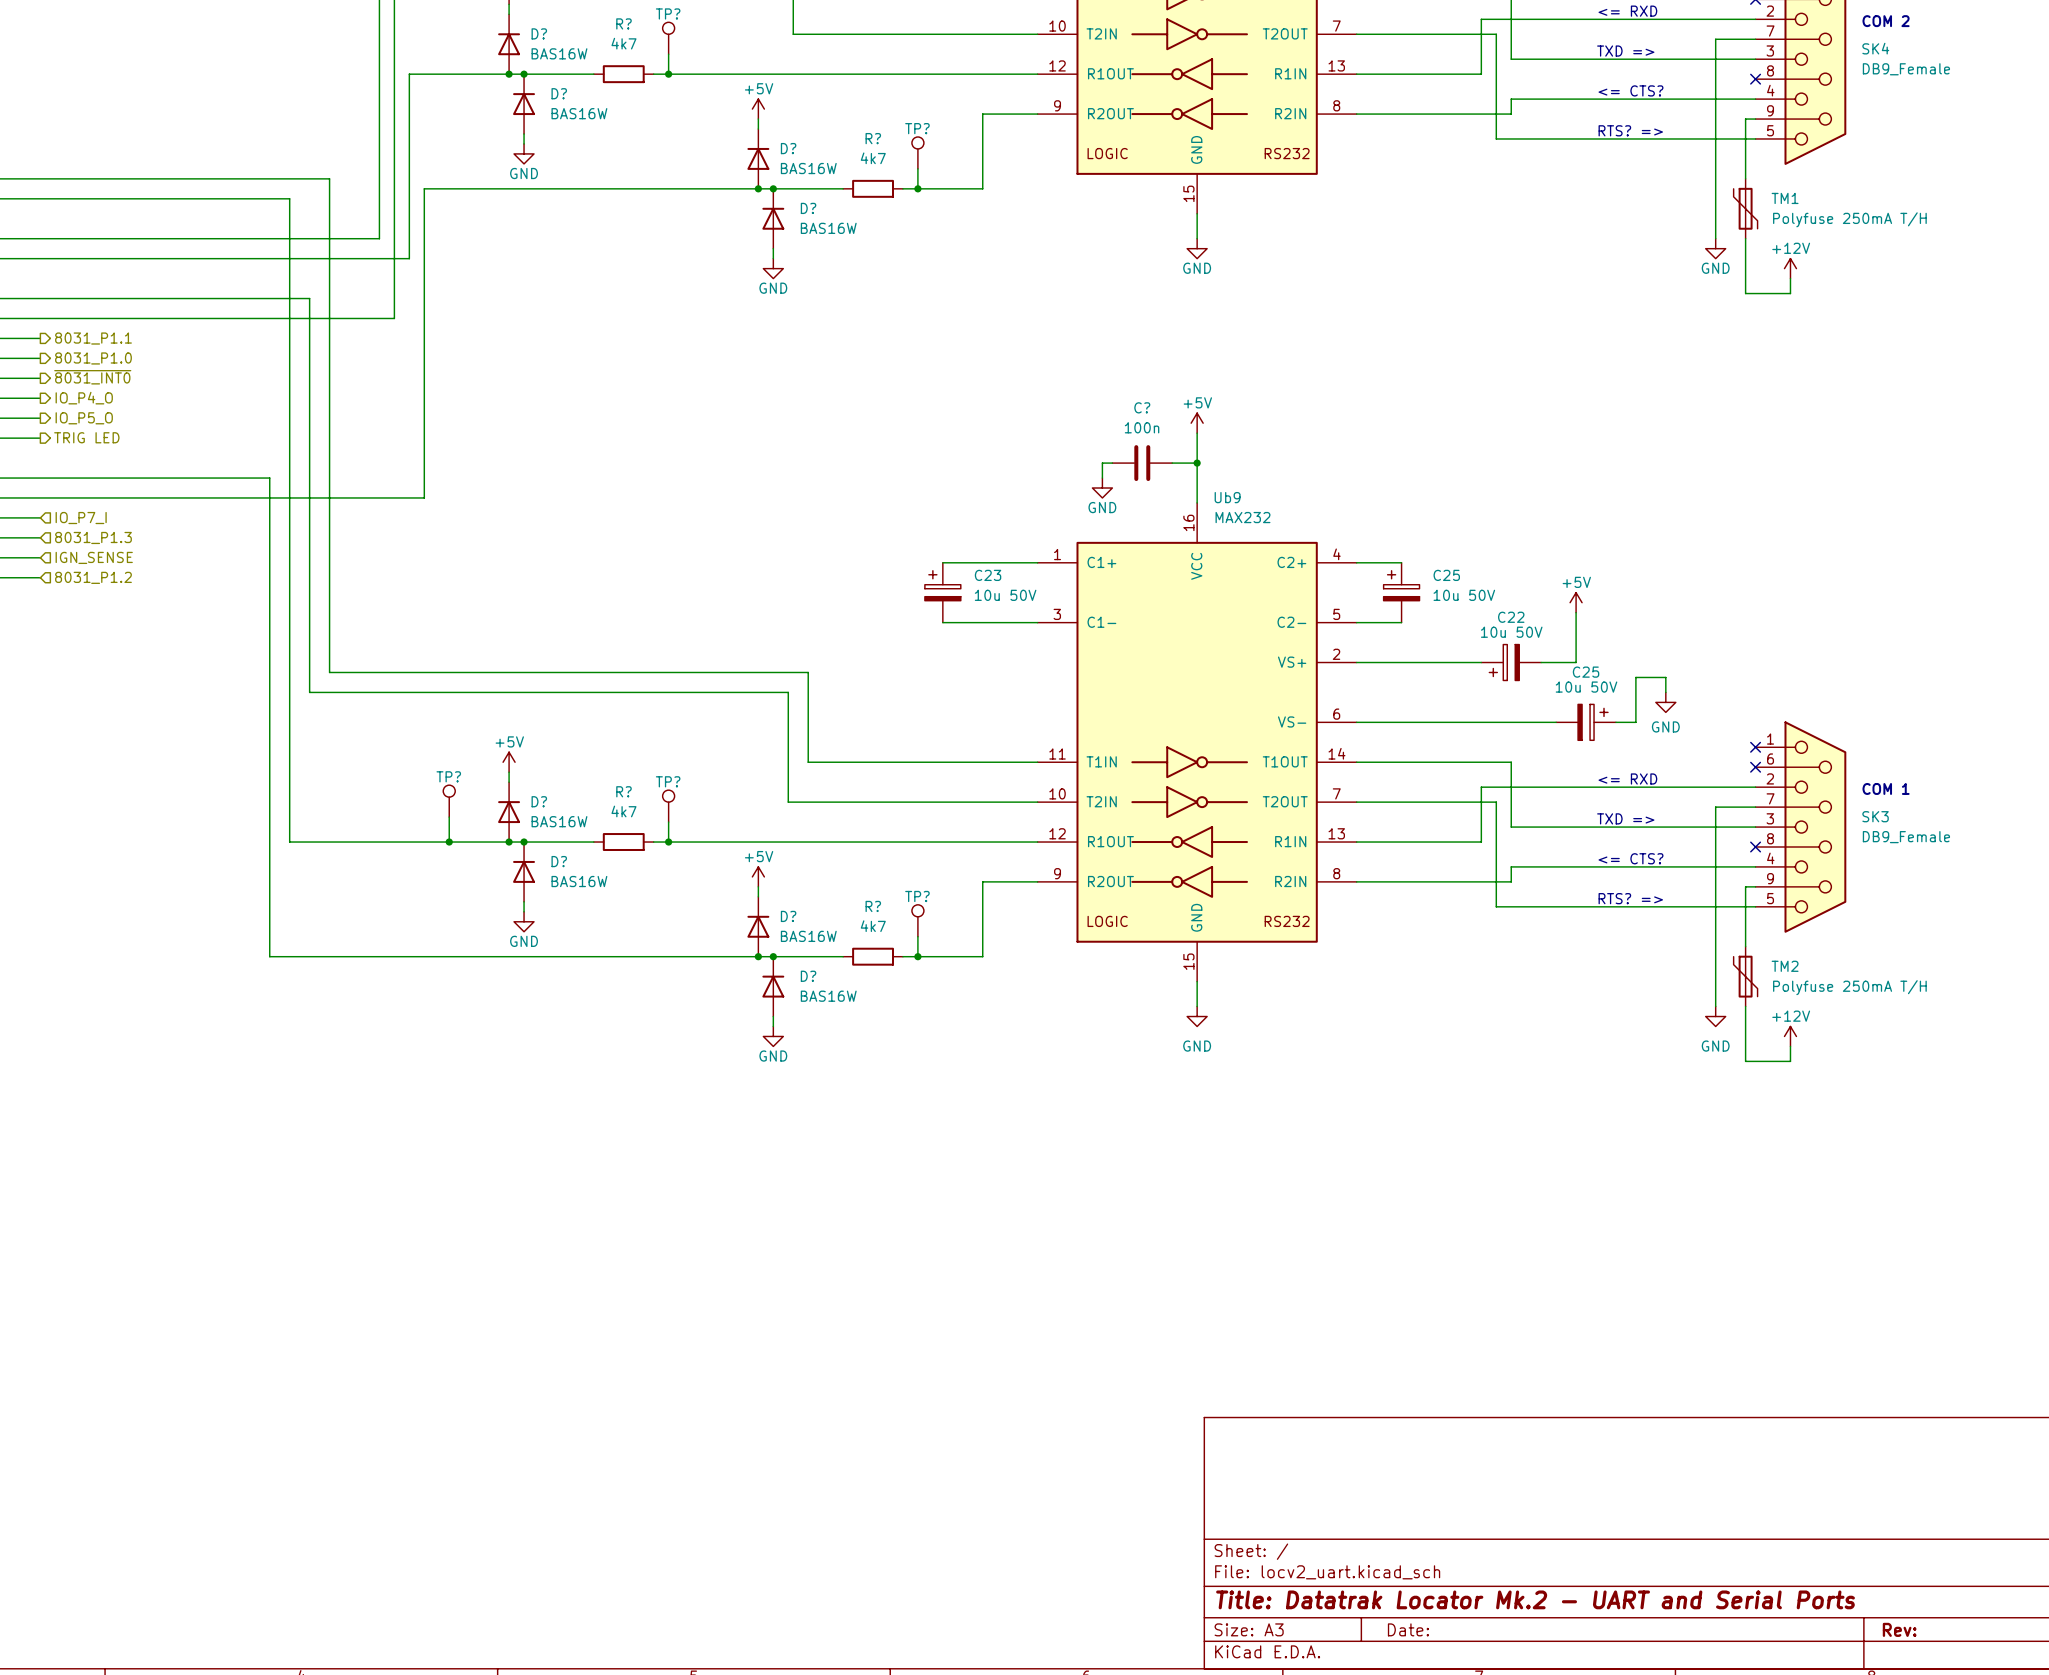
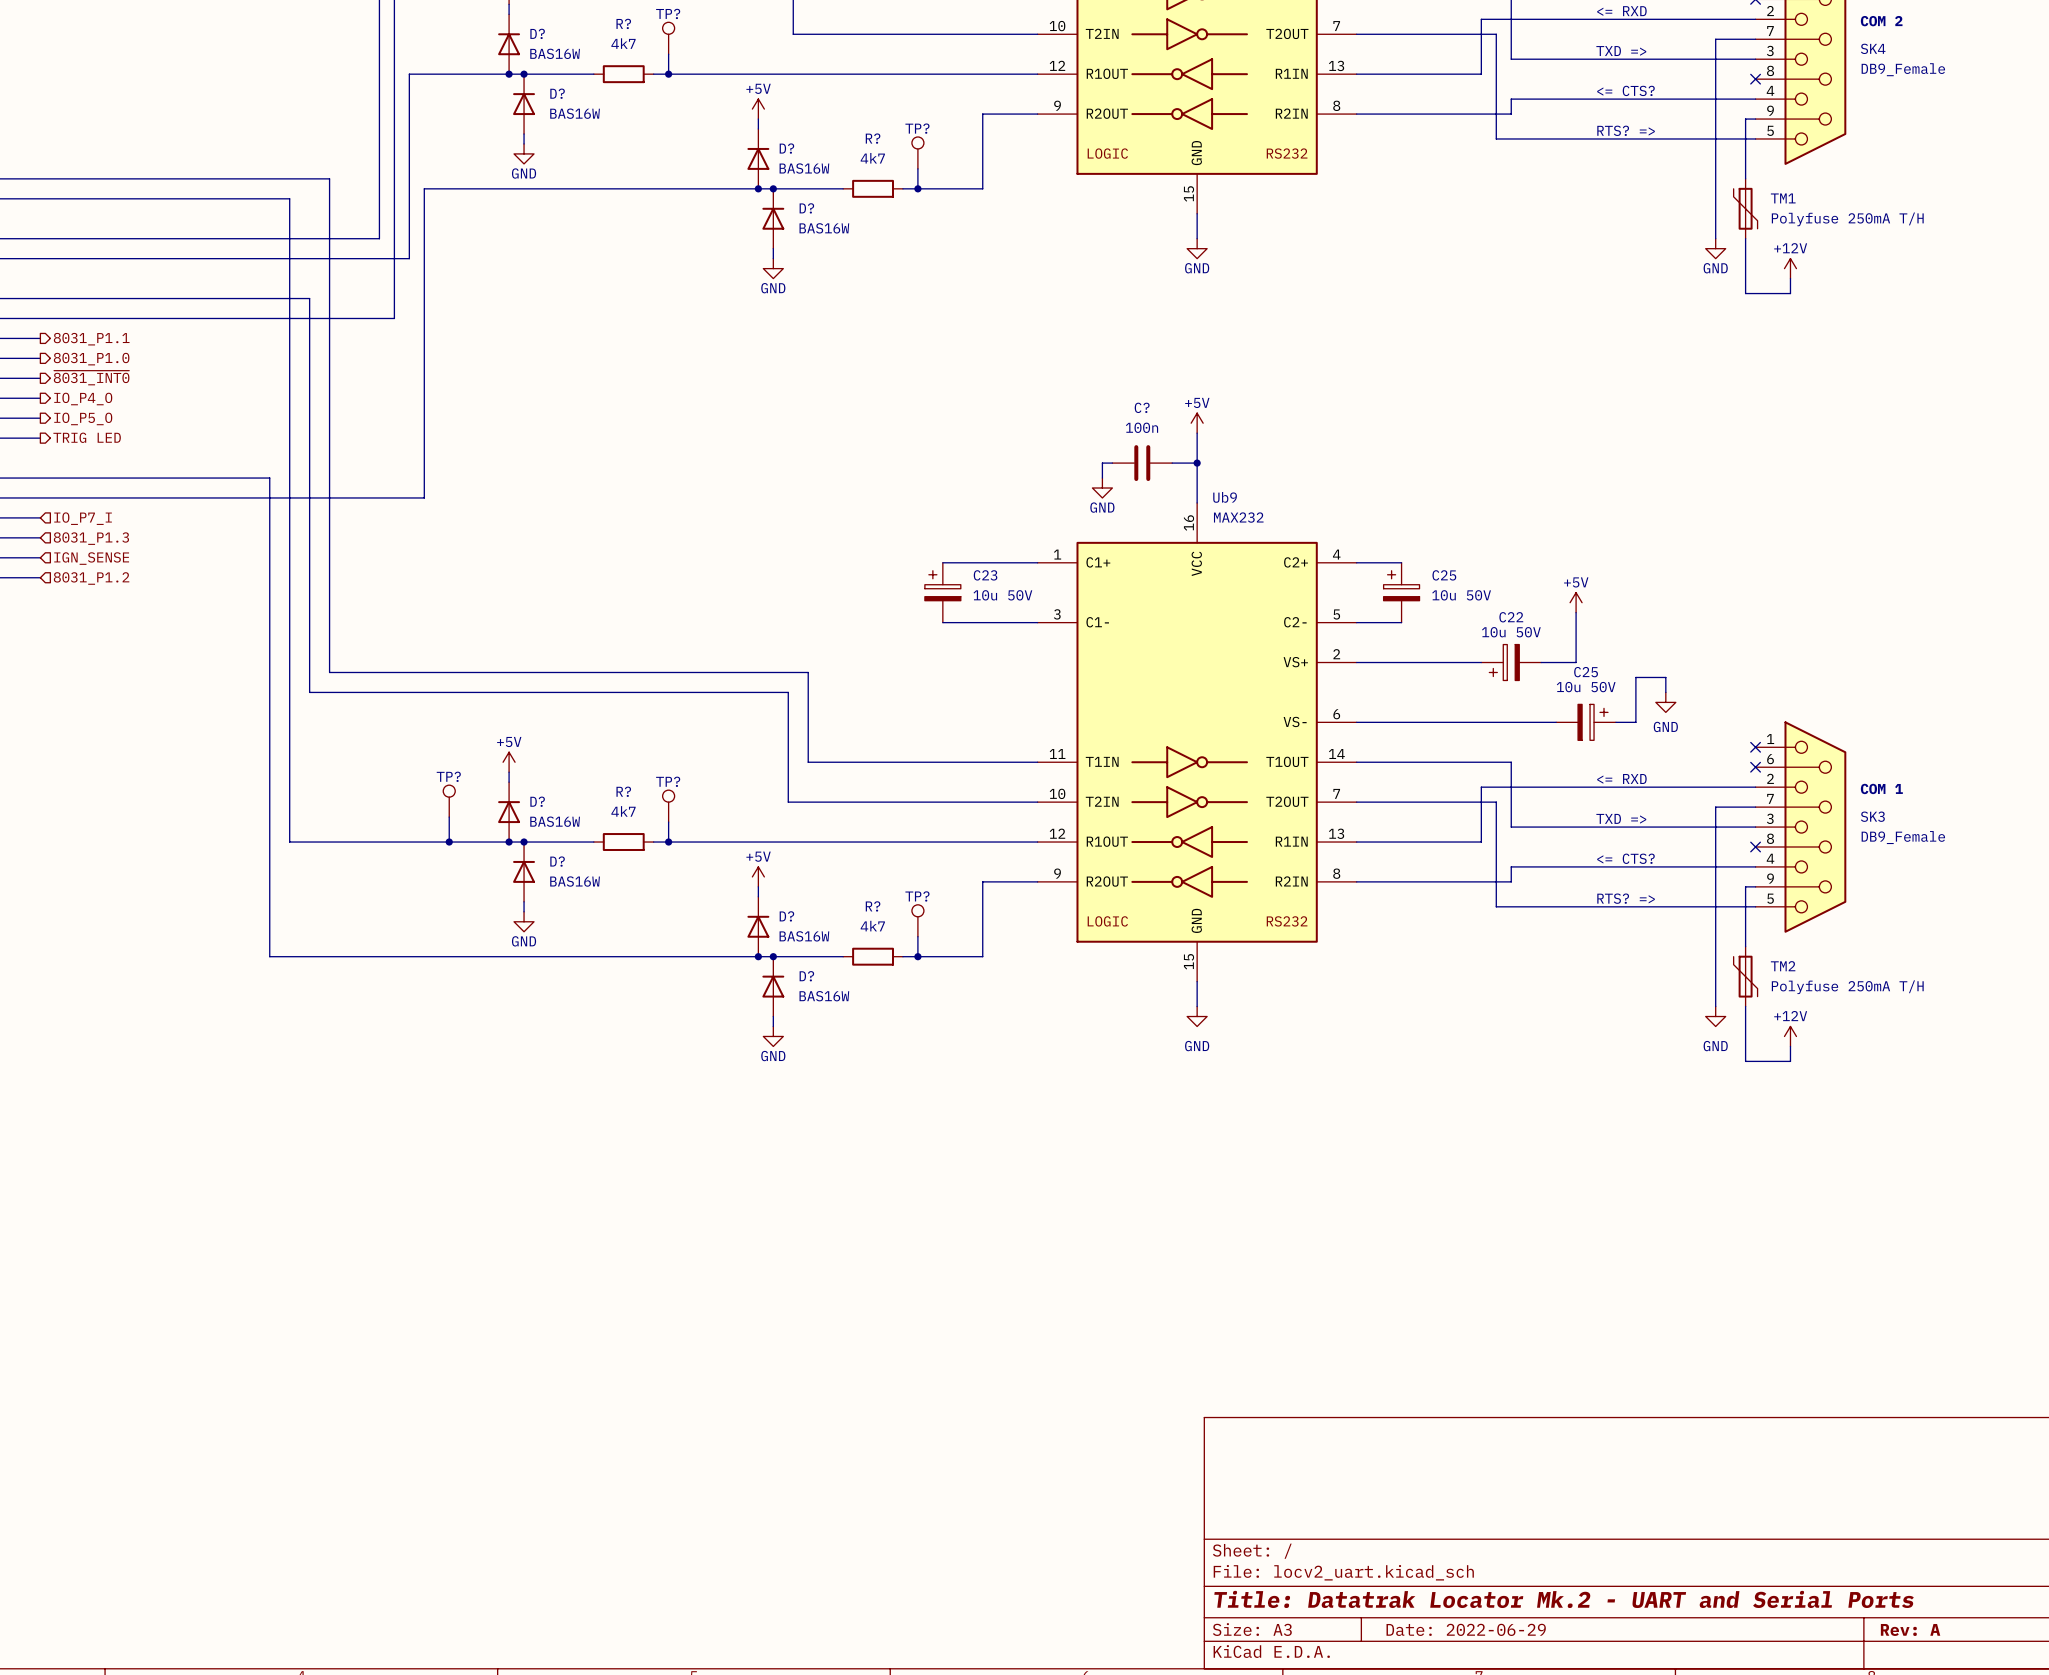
title block: Date: (1408, 1629) -> Date: 2022-06-29 (1466, 1629)
title block: Rev: (1899, 1629) -> Rev: A (1910, 1629)

